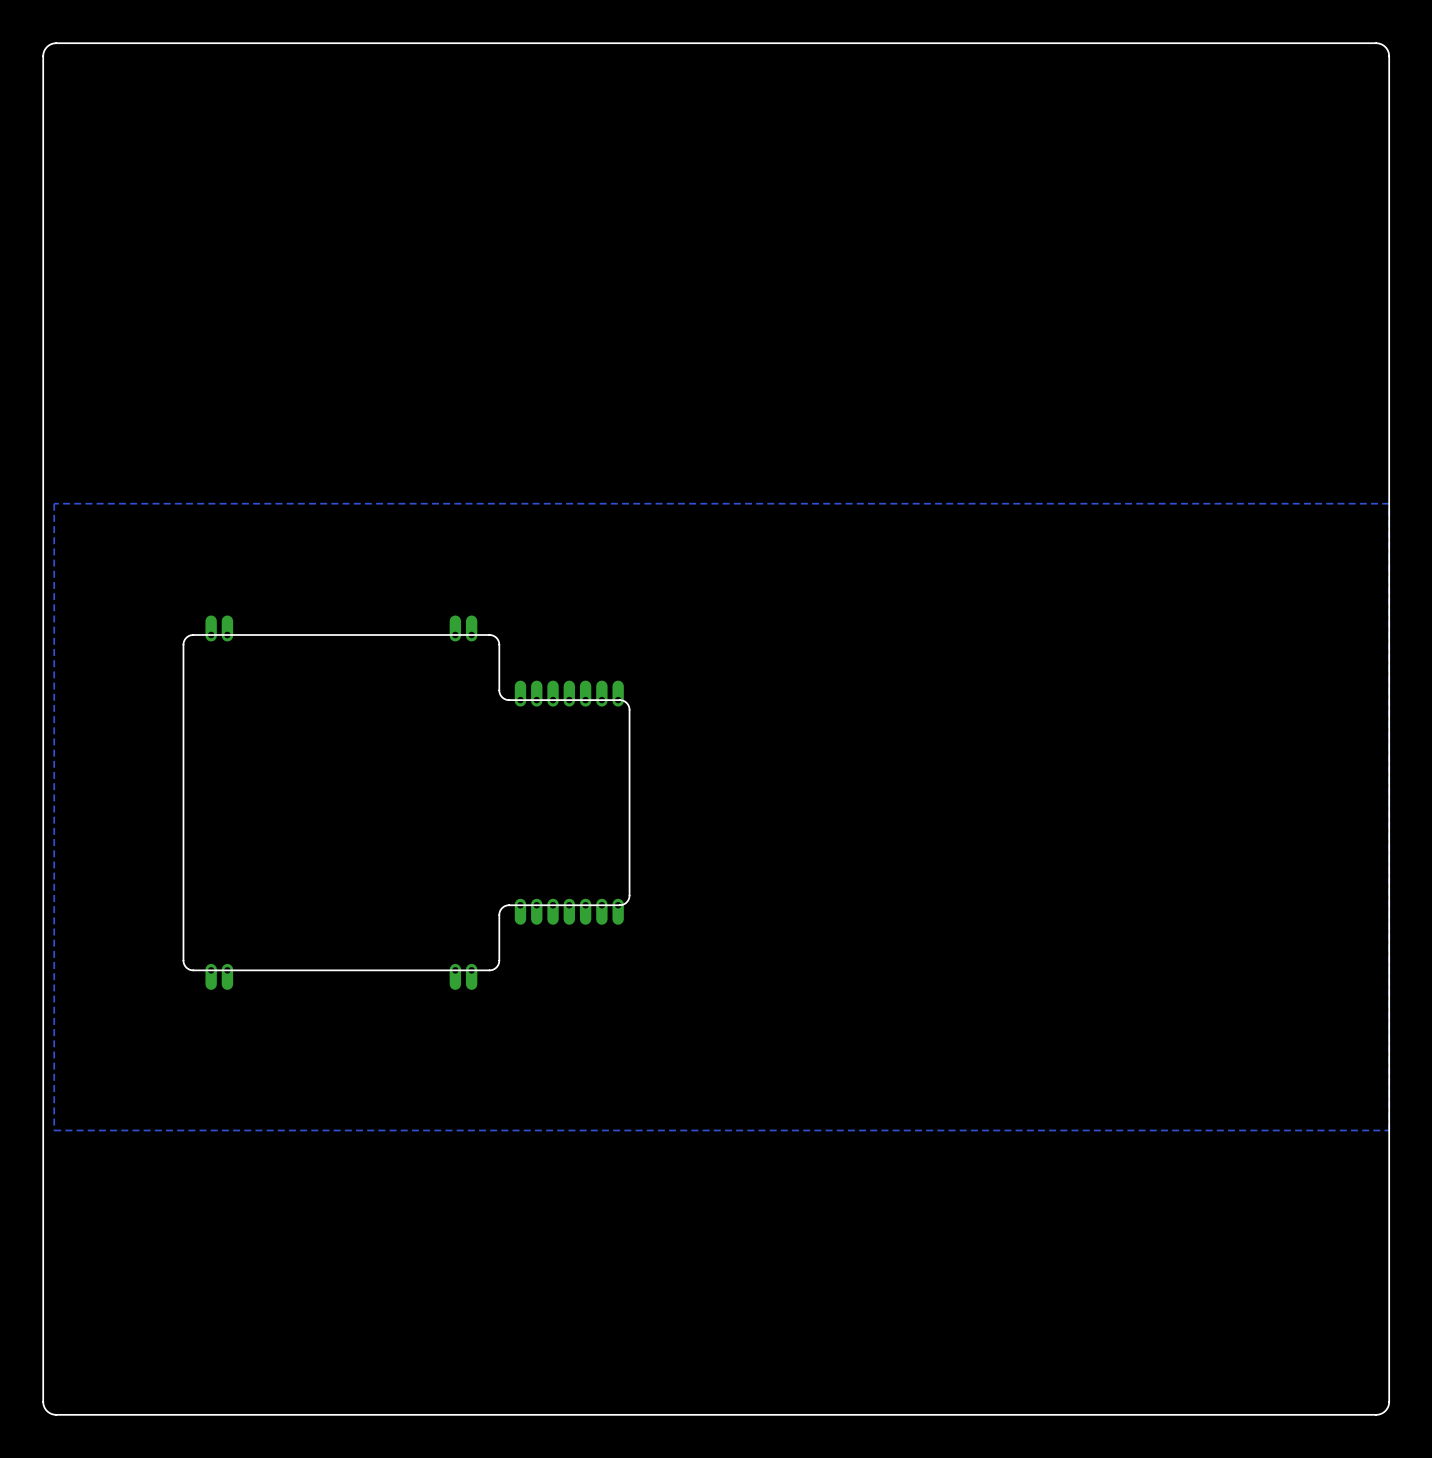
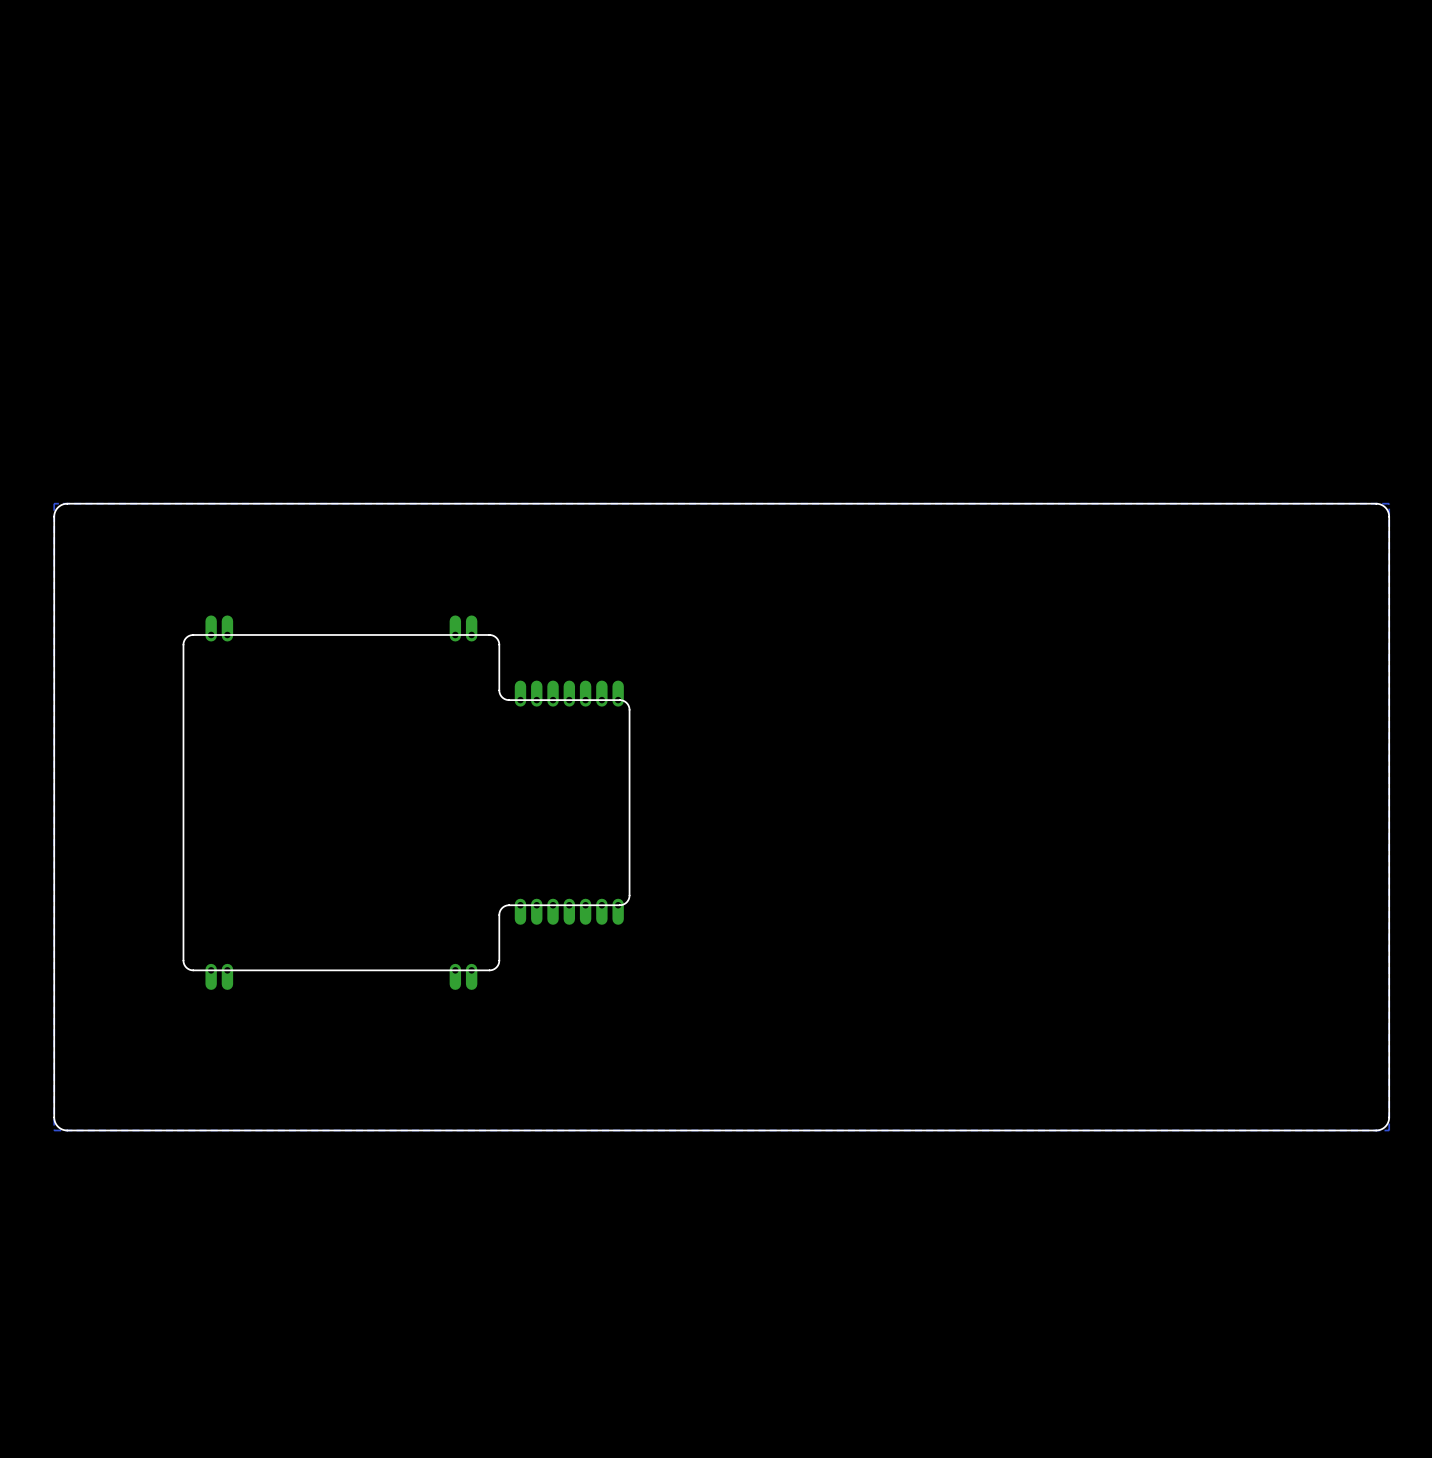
board edge: (1389, 516) (1389, 56) (1387, 49) (1381, 44) (56, 43) (48, 45) (44, 51) (43, 1401) (48, 1412) (56, 1414) (1379, 1414) (1386, 1409) (1389, 1401) (1389, 1117) -> (1389, 516) (1385, 507) (1376, 503) (67, 503) (58, 507) (54, 516) (54, 1117) (55, 1123) (62, 1129) (1376, 1130) (1385, 1126) (1389, 1117)

